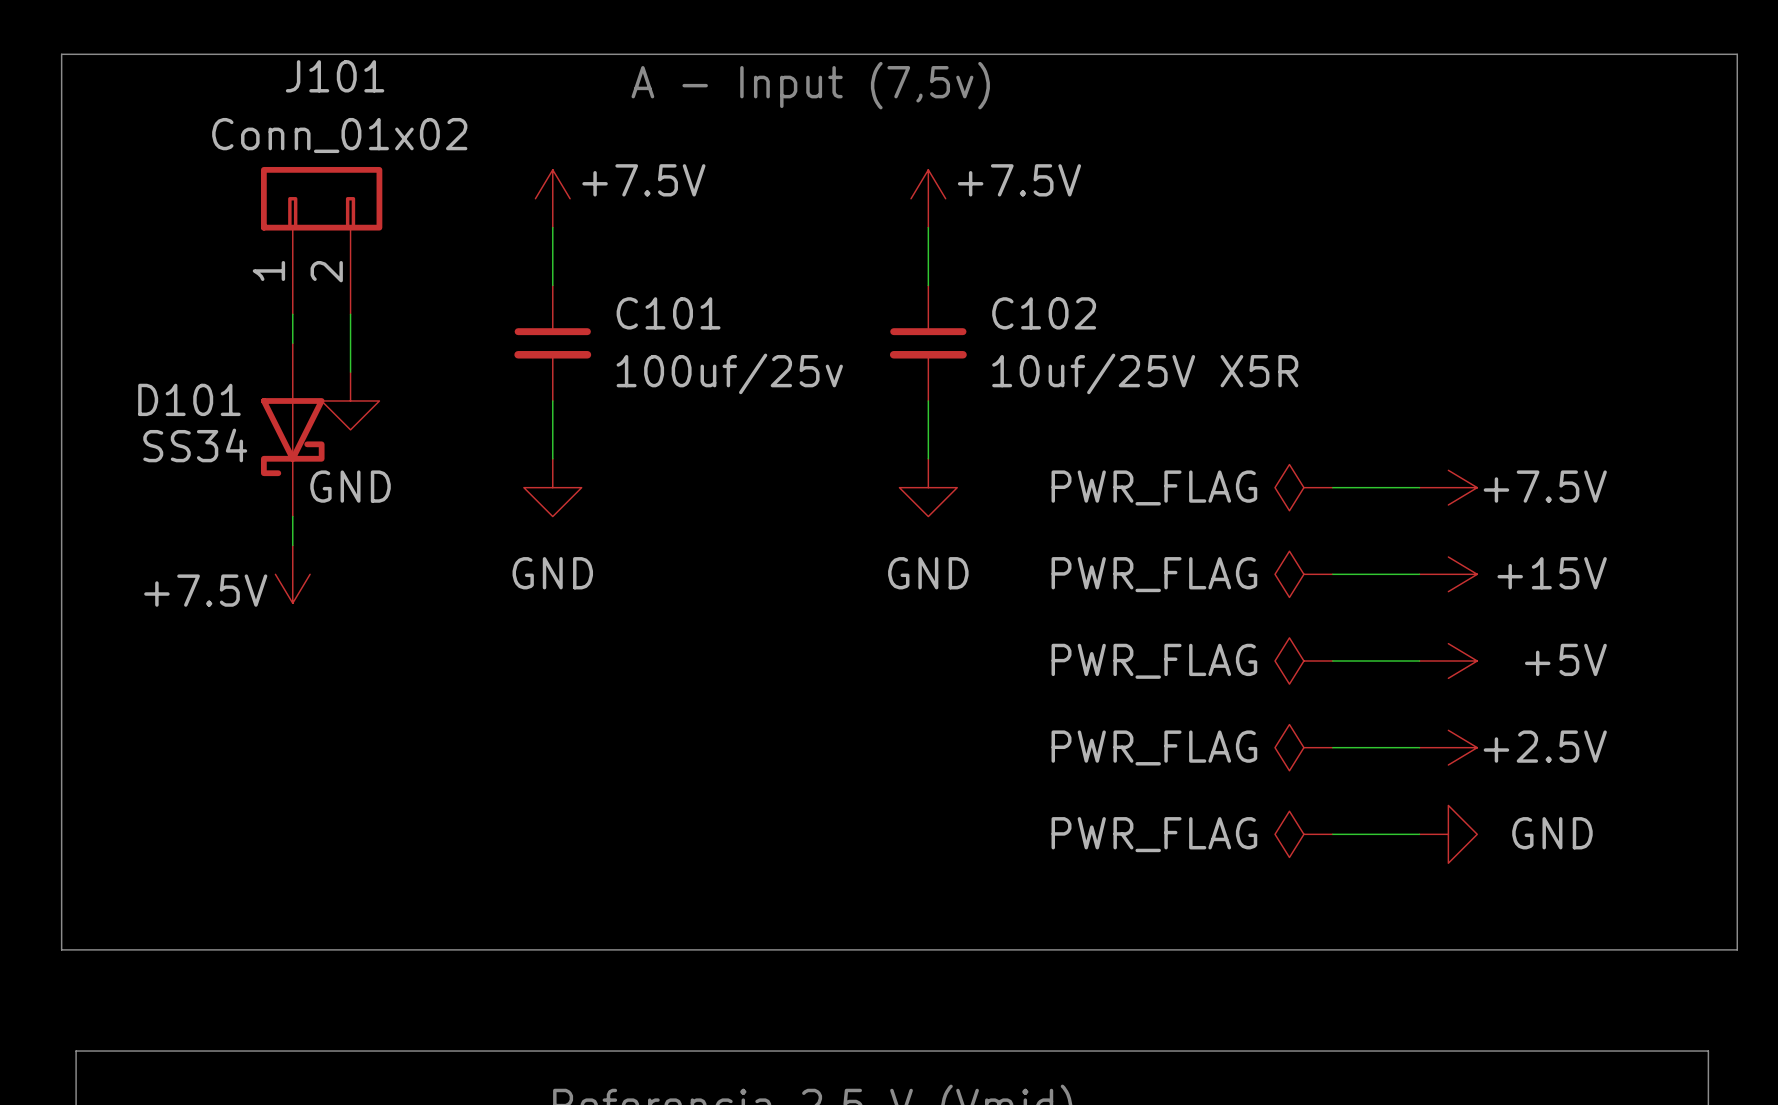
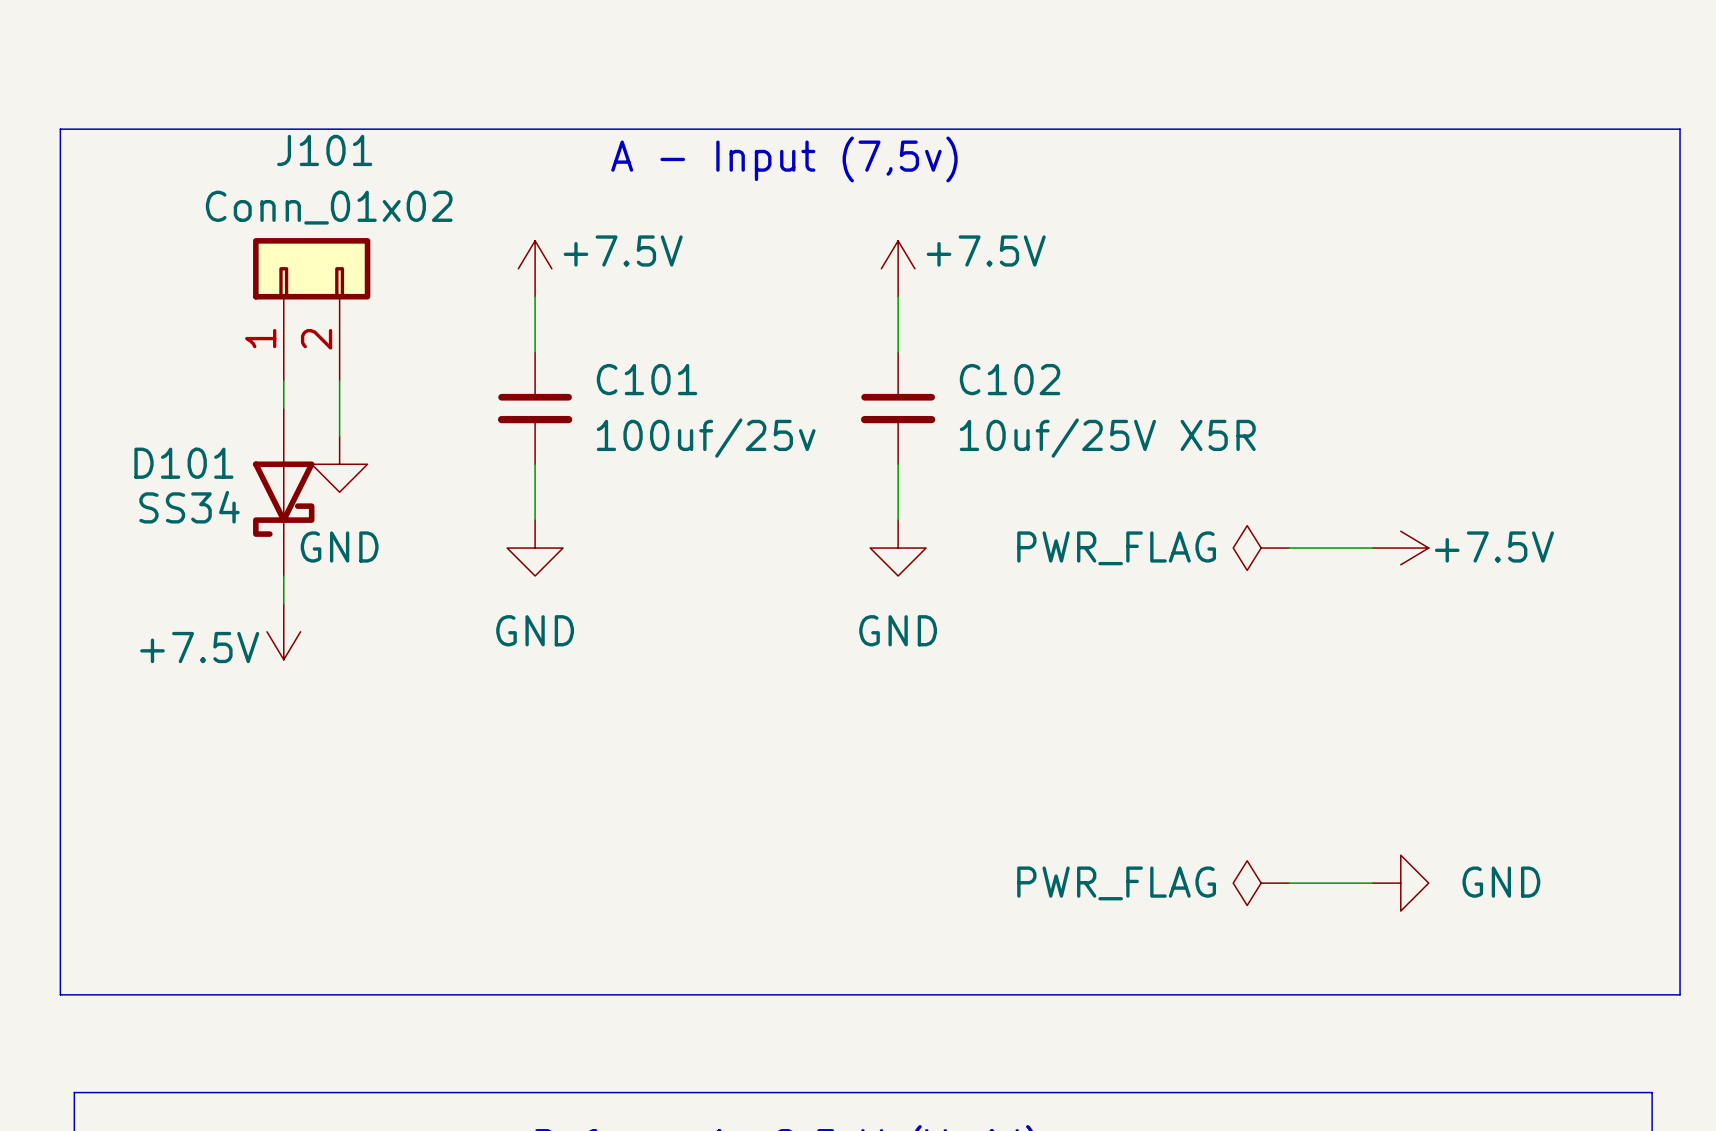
power symbol: PWR_FLAG (1303, 574) -> none
wire: (1332, 574) (1419, 574) -> none
power symbol: +15V (1448, 574) -> none
power symbol: PWR_FLAG (1303, 661) -> none
wire: (1332, 661) (1419, 661) -> none
power symbol: +5V (1448, 661) -> none
power symbol: PWR_FLAG (1303, 747) -> none
wire: (1332, 747) (1419, 747) -> none
power symbol: +2.5V (1448, 747) -> none

